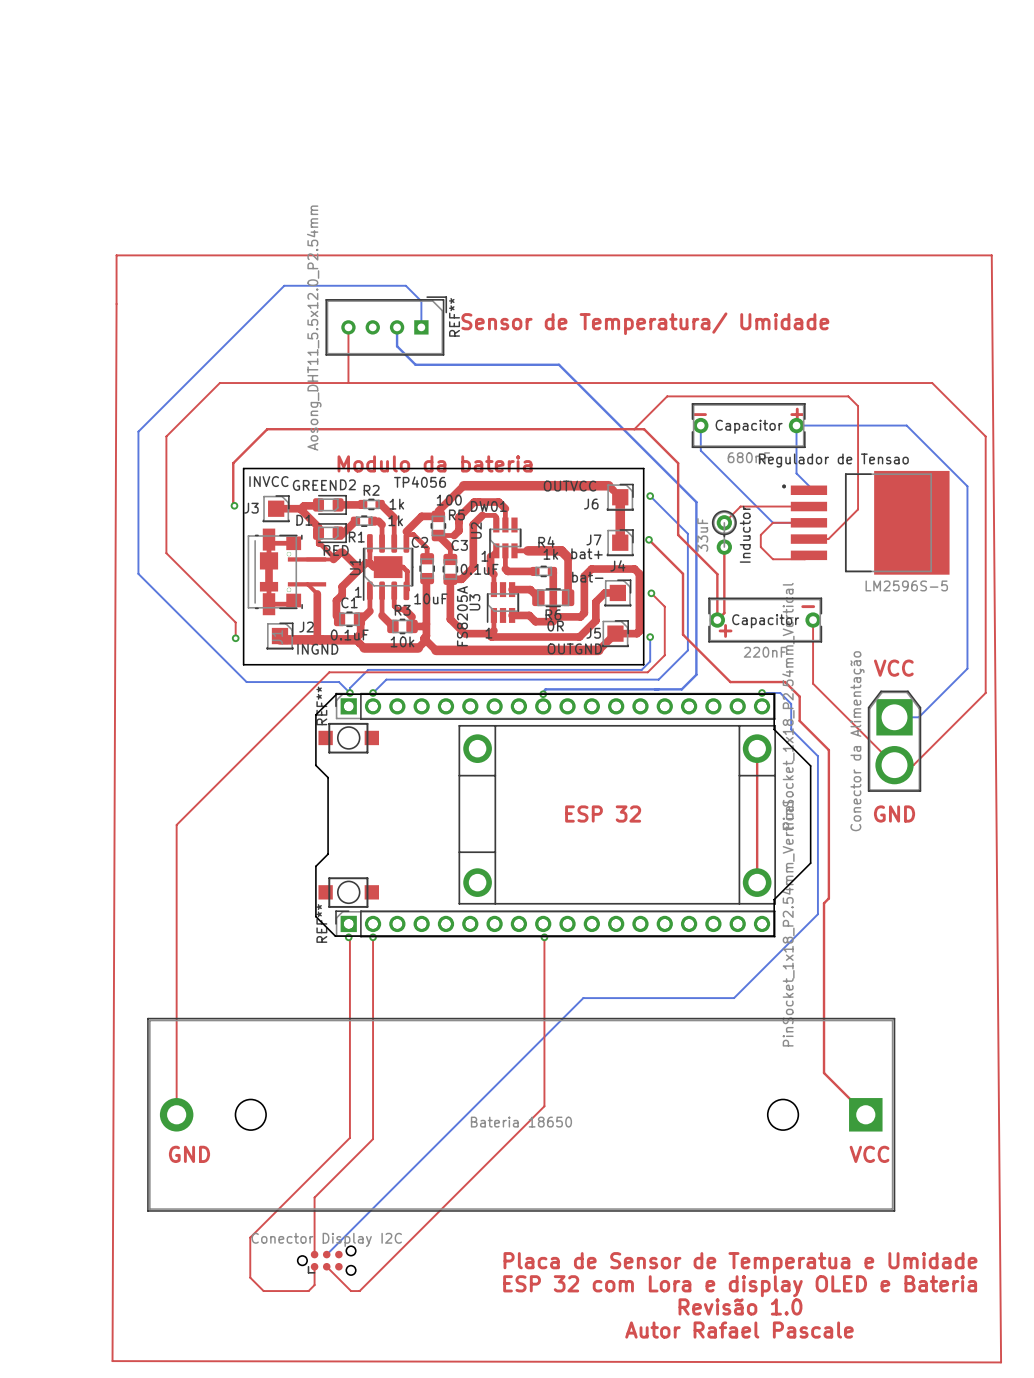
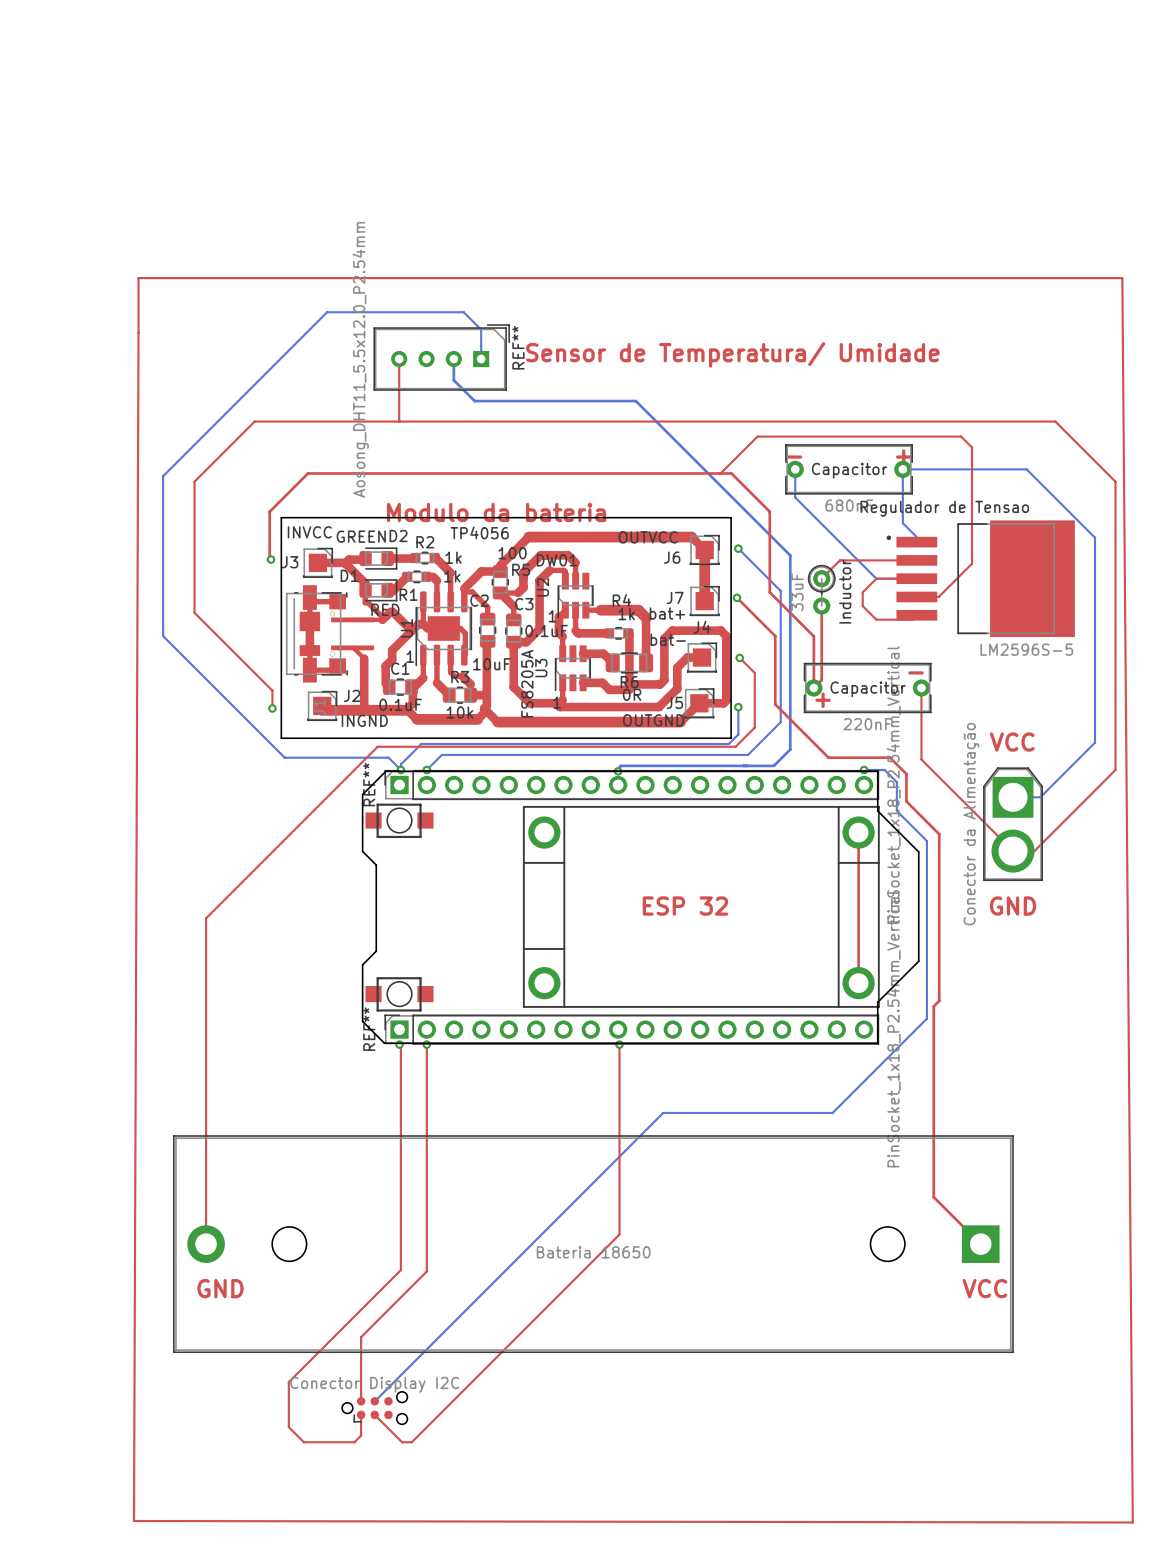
text: Placa de Sensor de Temperatua e Umidade (740, 1263) -> none
text: ESP 32 com Lora e display OLED e Bateria (740, 1286) -> none
text: Revisão 1.0 (740, 1306) -> none
text: Autor Rafael Pascale (739, 1330) -> none

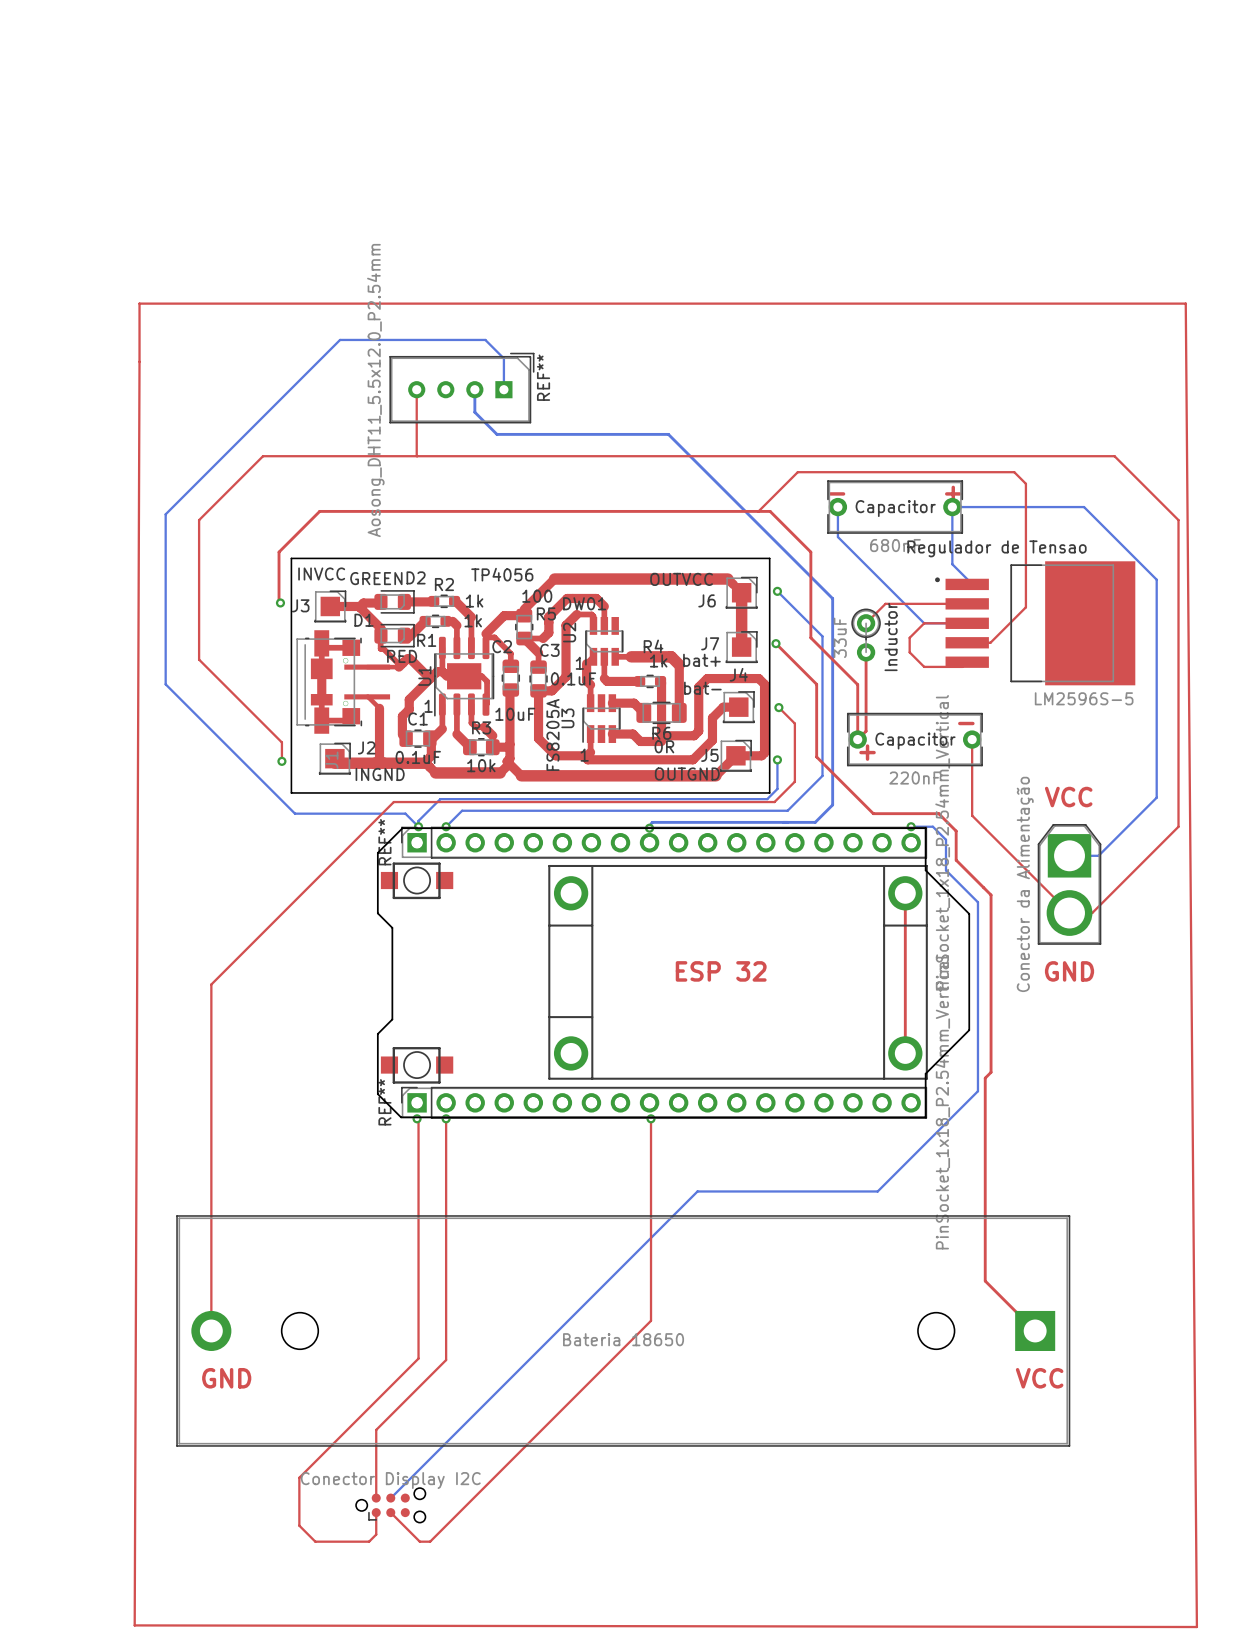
text: Sensor de Temperatura/ Umidade (732, 354) -> none
text: Modulo da bateria (496, 512) -> none

